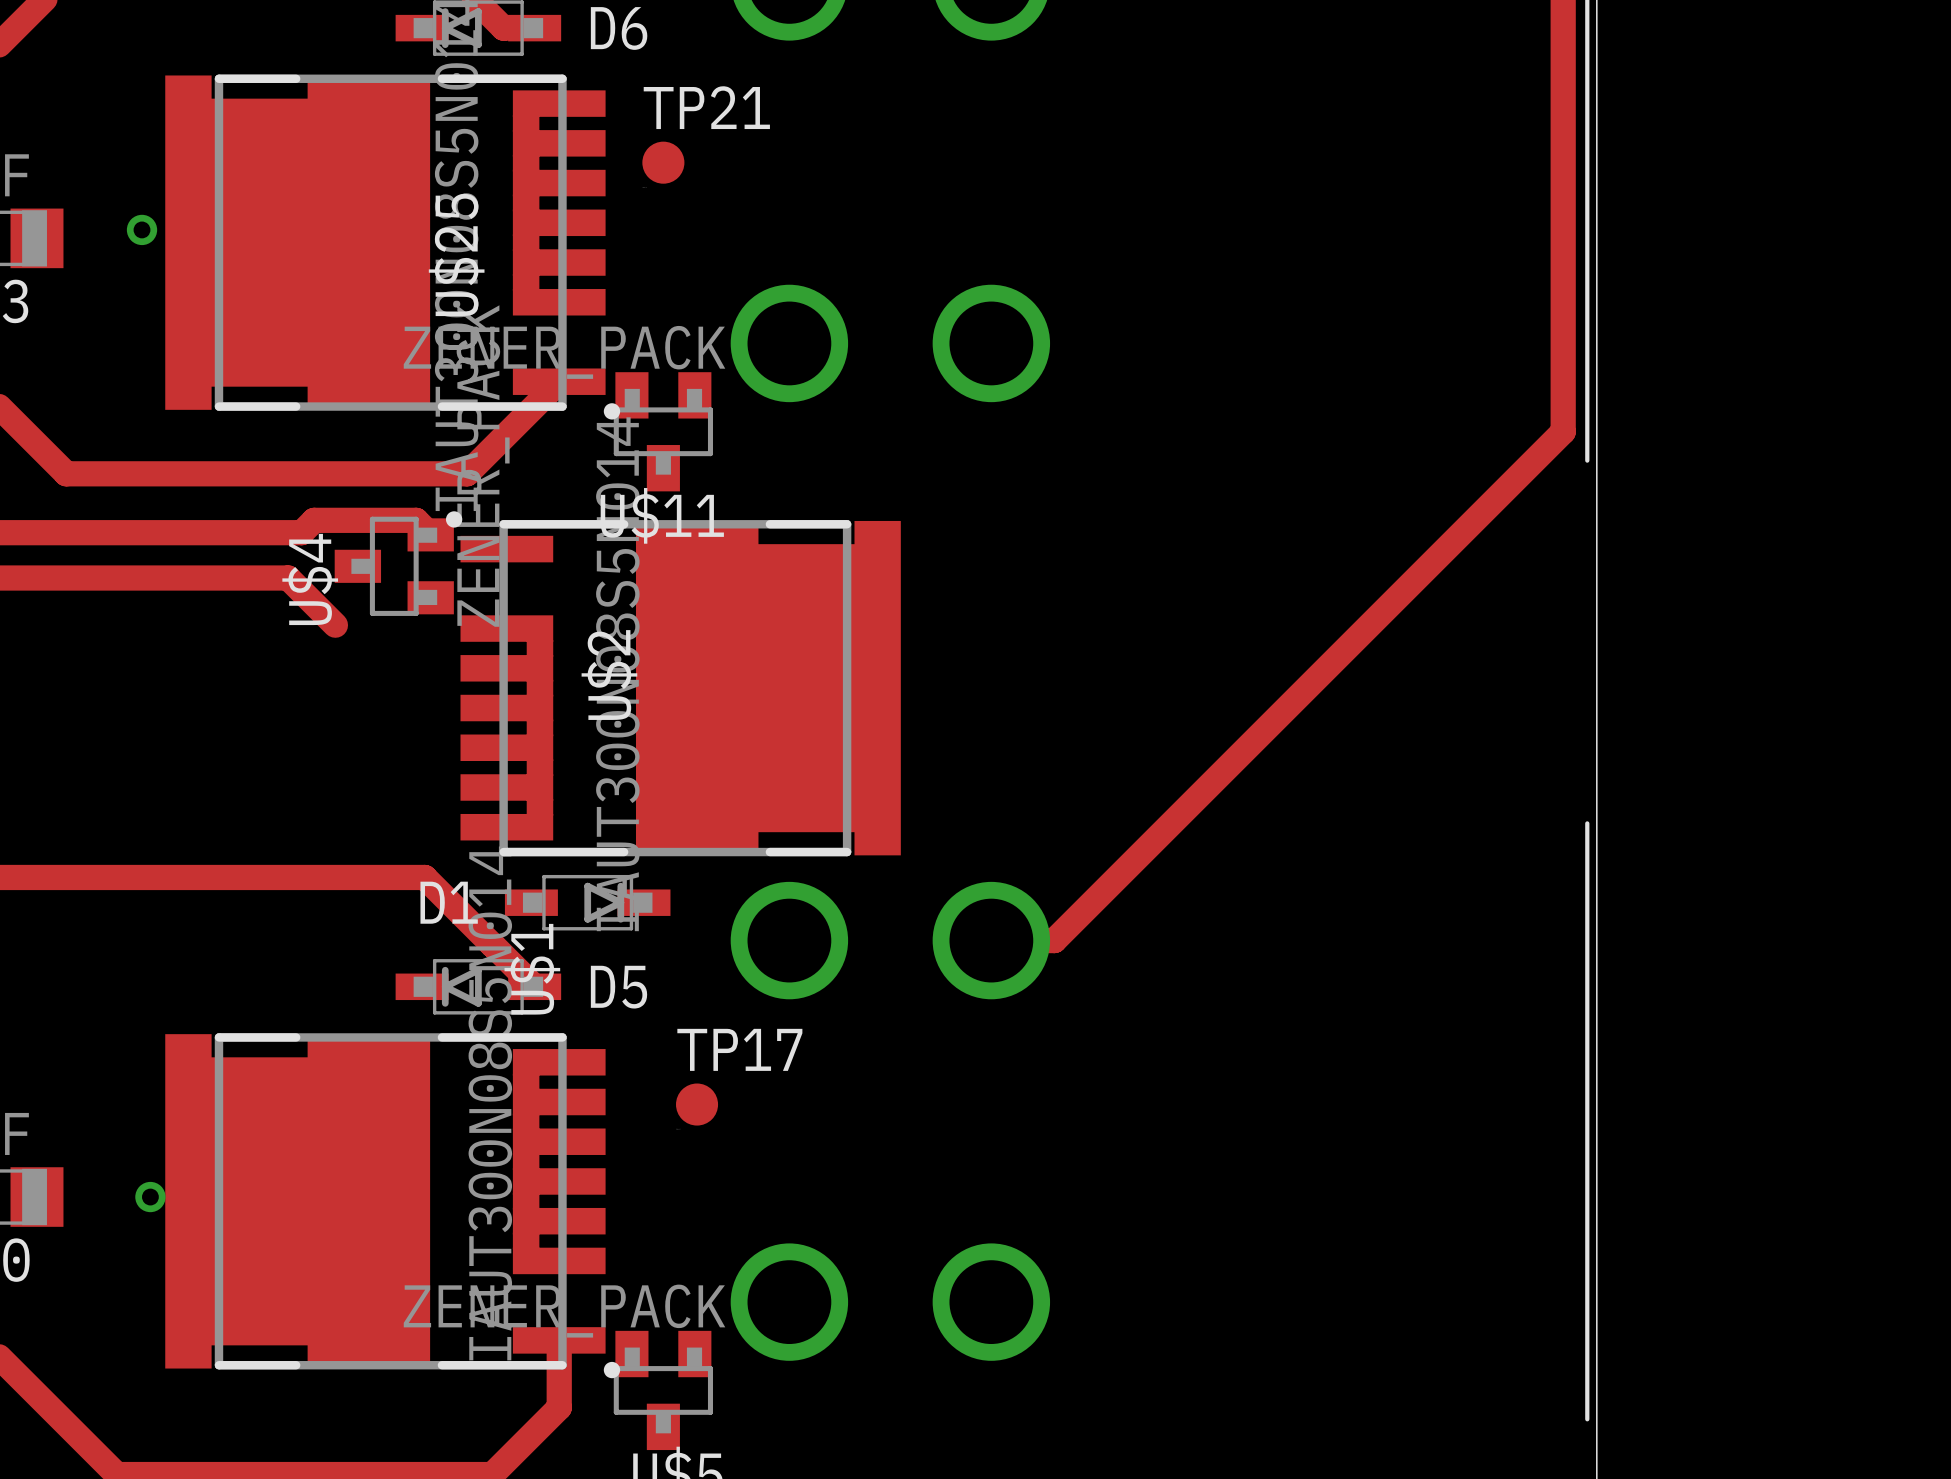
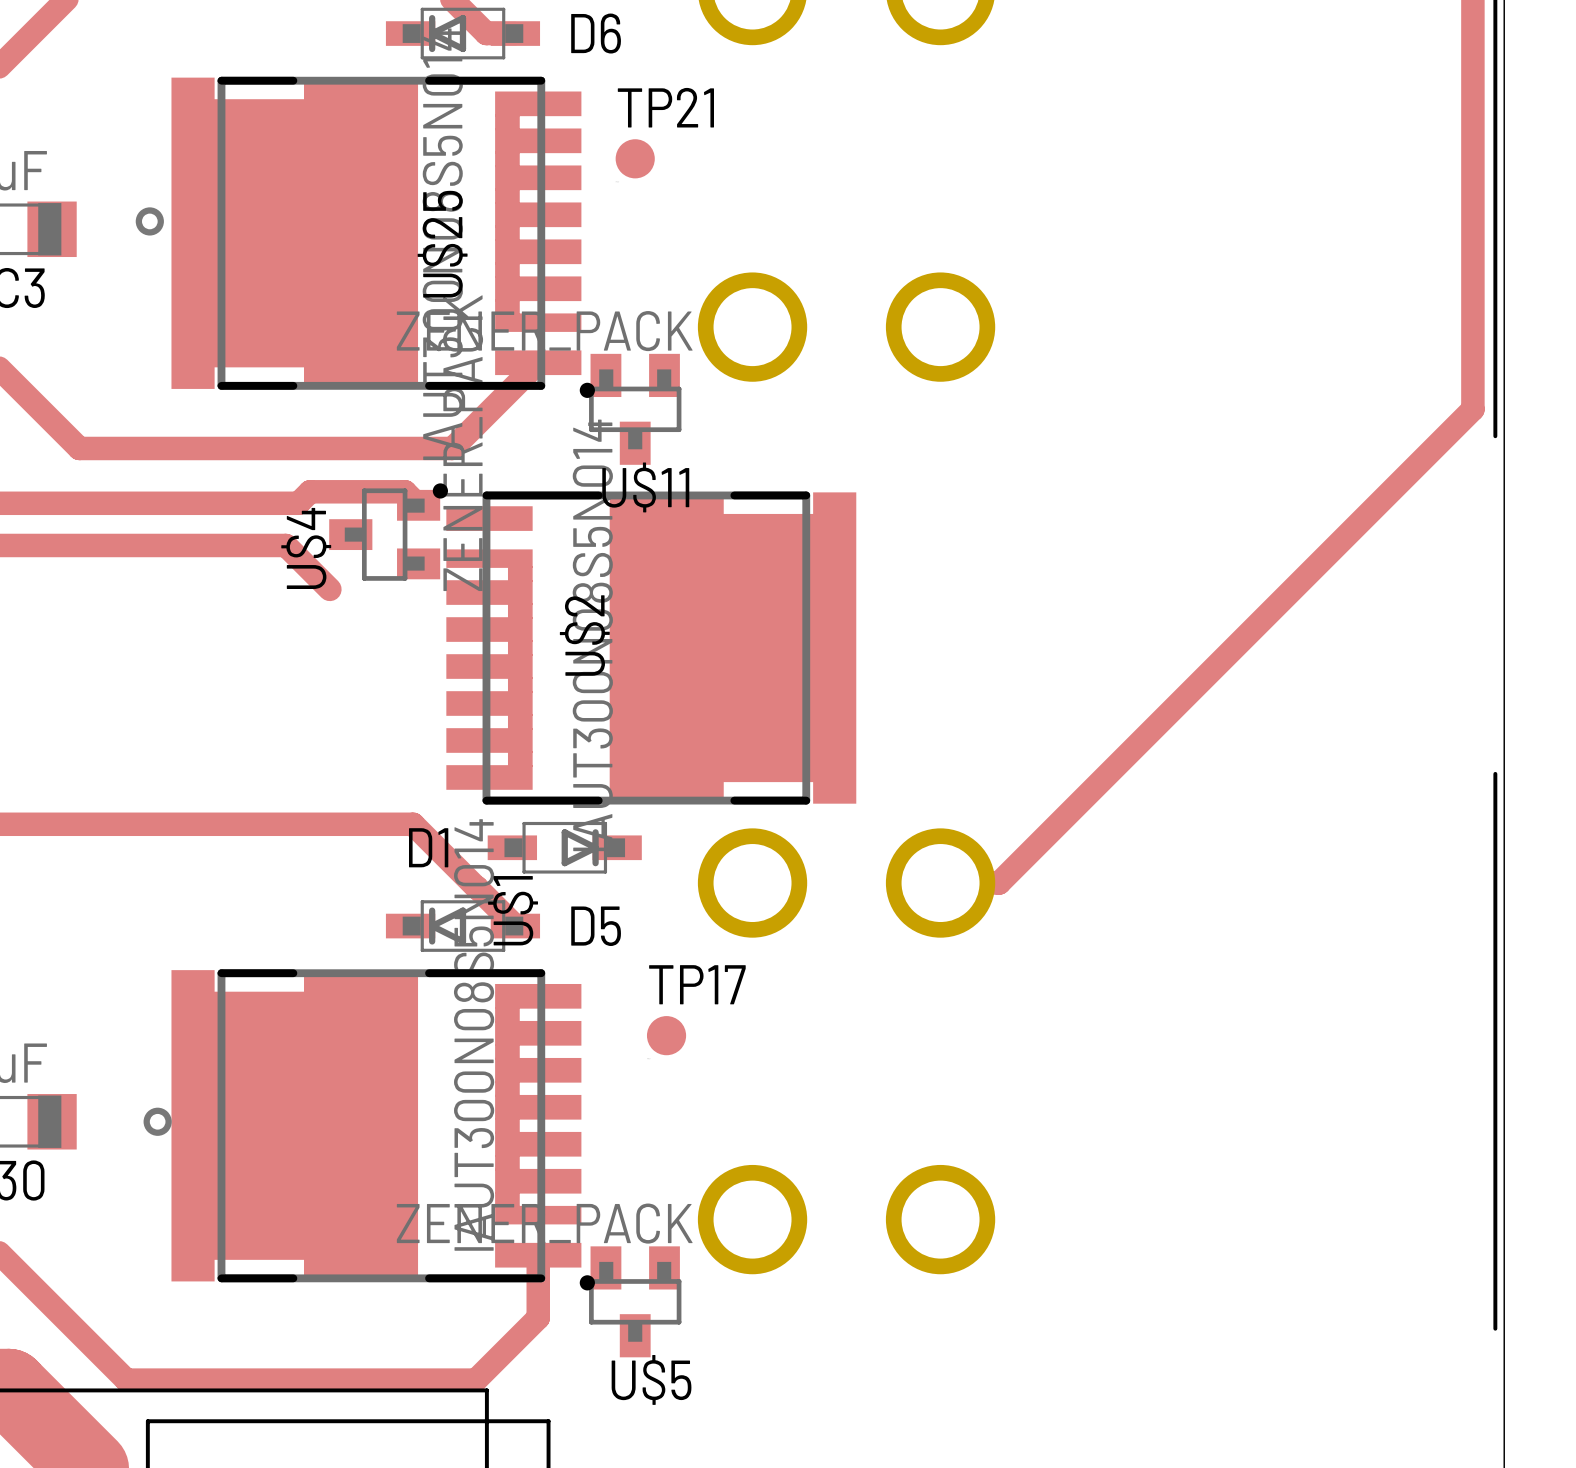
U$25 footprint: [165, 74, 621, 420] -> [171, 76, 595, 398]
U$2 footprint: [445, 511, 901, 857] -> [432, 483, 857, 805]
U$1 footprint: [165, 1033, 621, 1379] -> [171, 969, 595, 1291]

